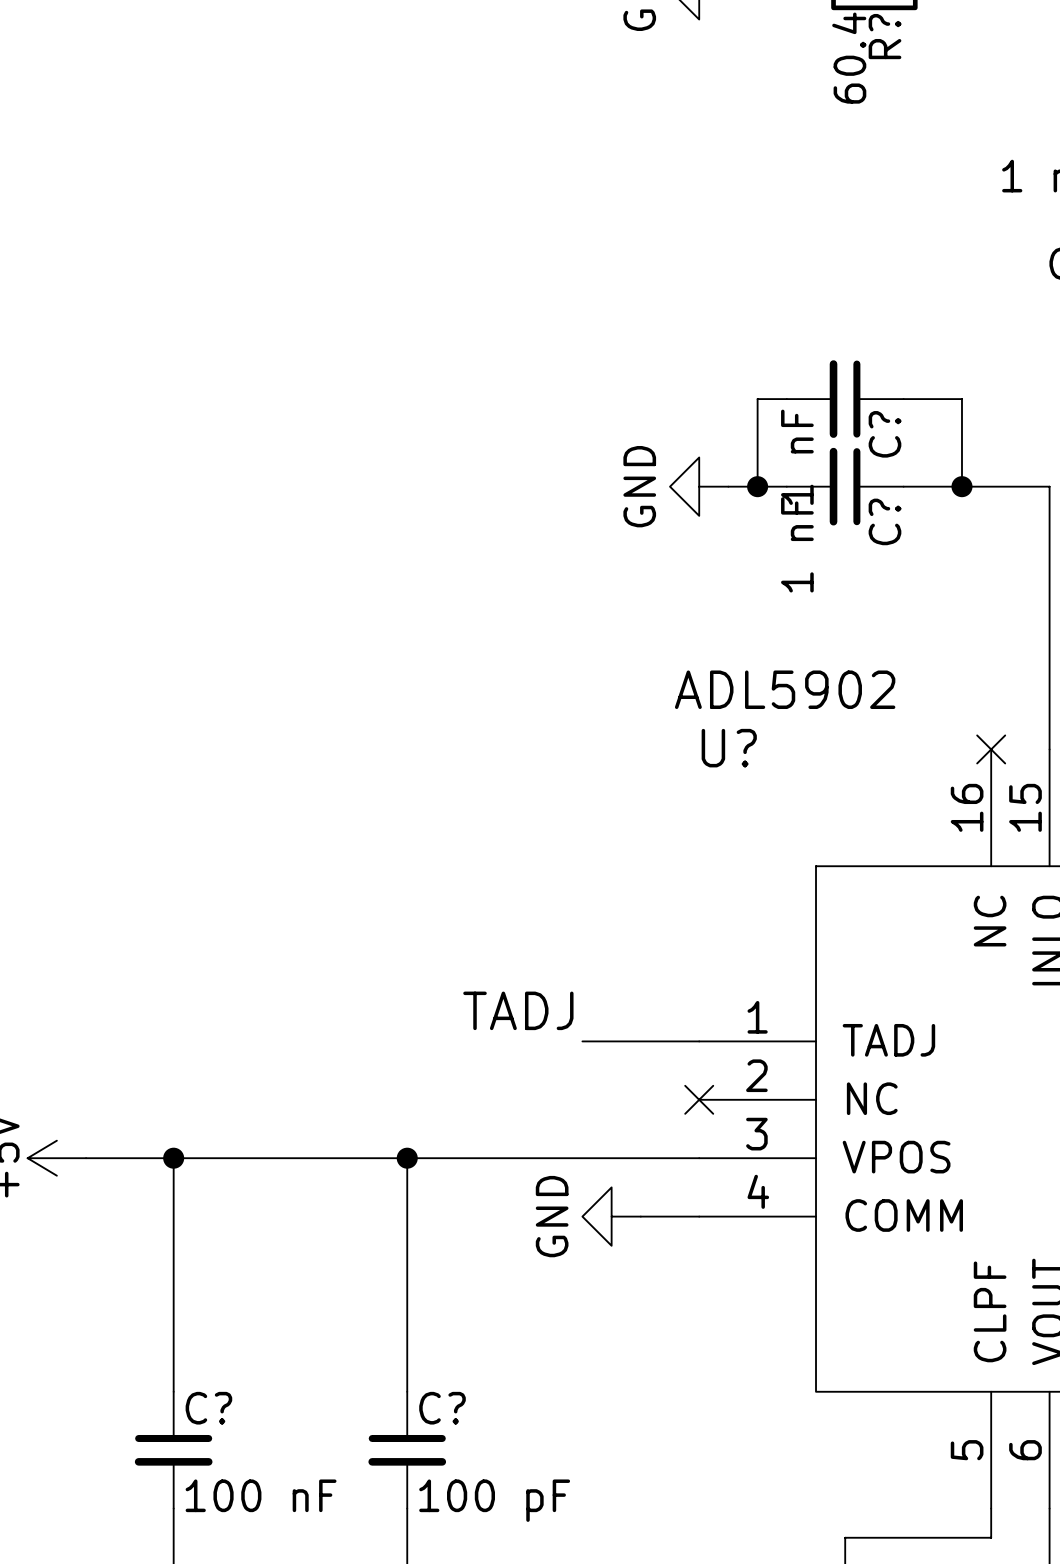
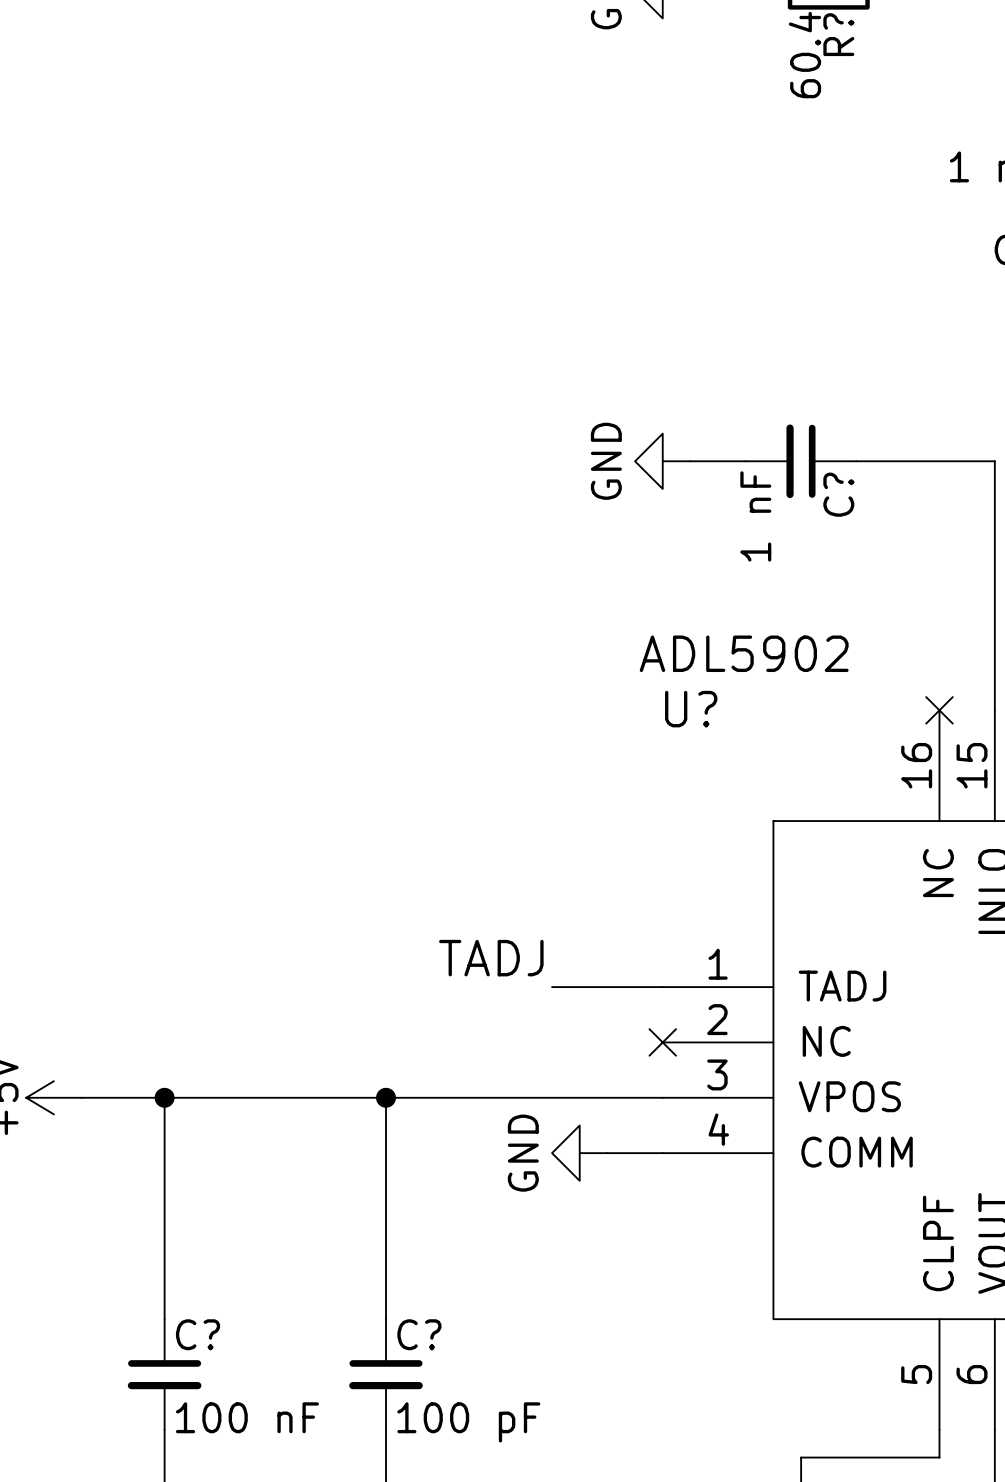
wire: (786, 399) (757, 399) (757, 486) -> none
C?: 1 nF (845, 399) -> none
wire: (903, 399) (961, 399) (961, 486) -> none
junction: (757, 486) -> none
junction: (961, 486) -> none

